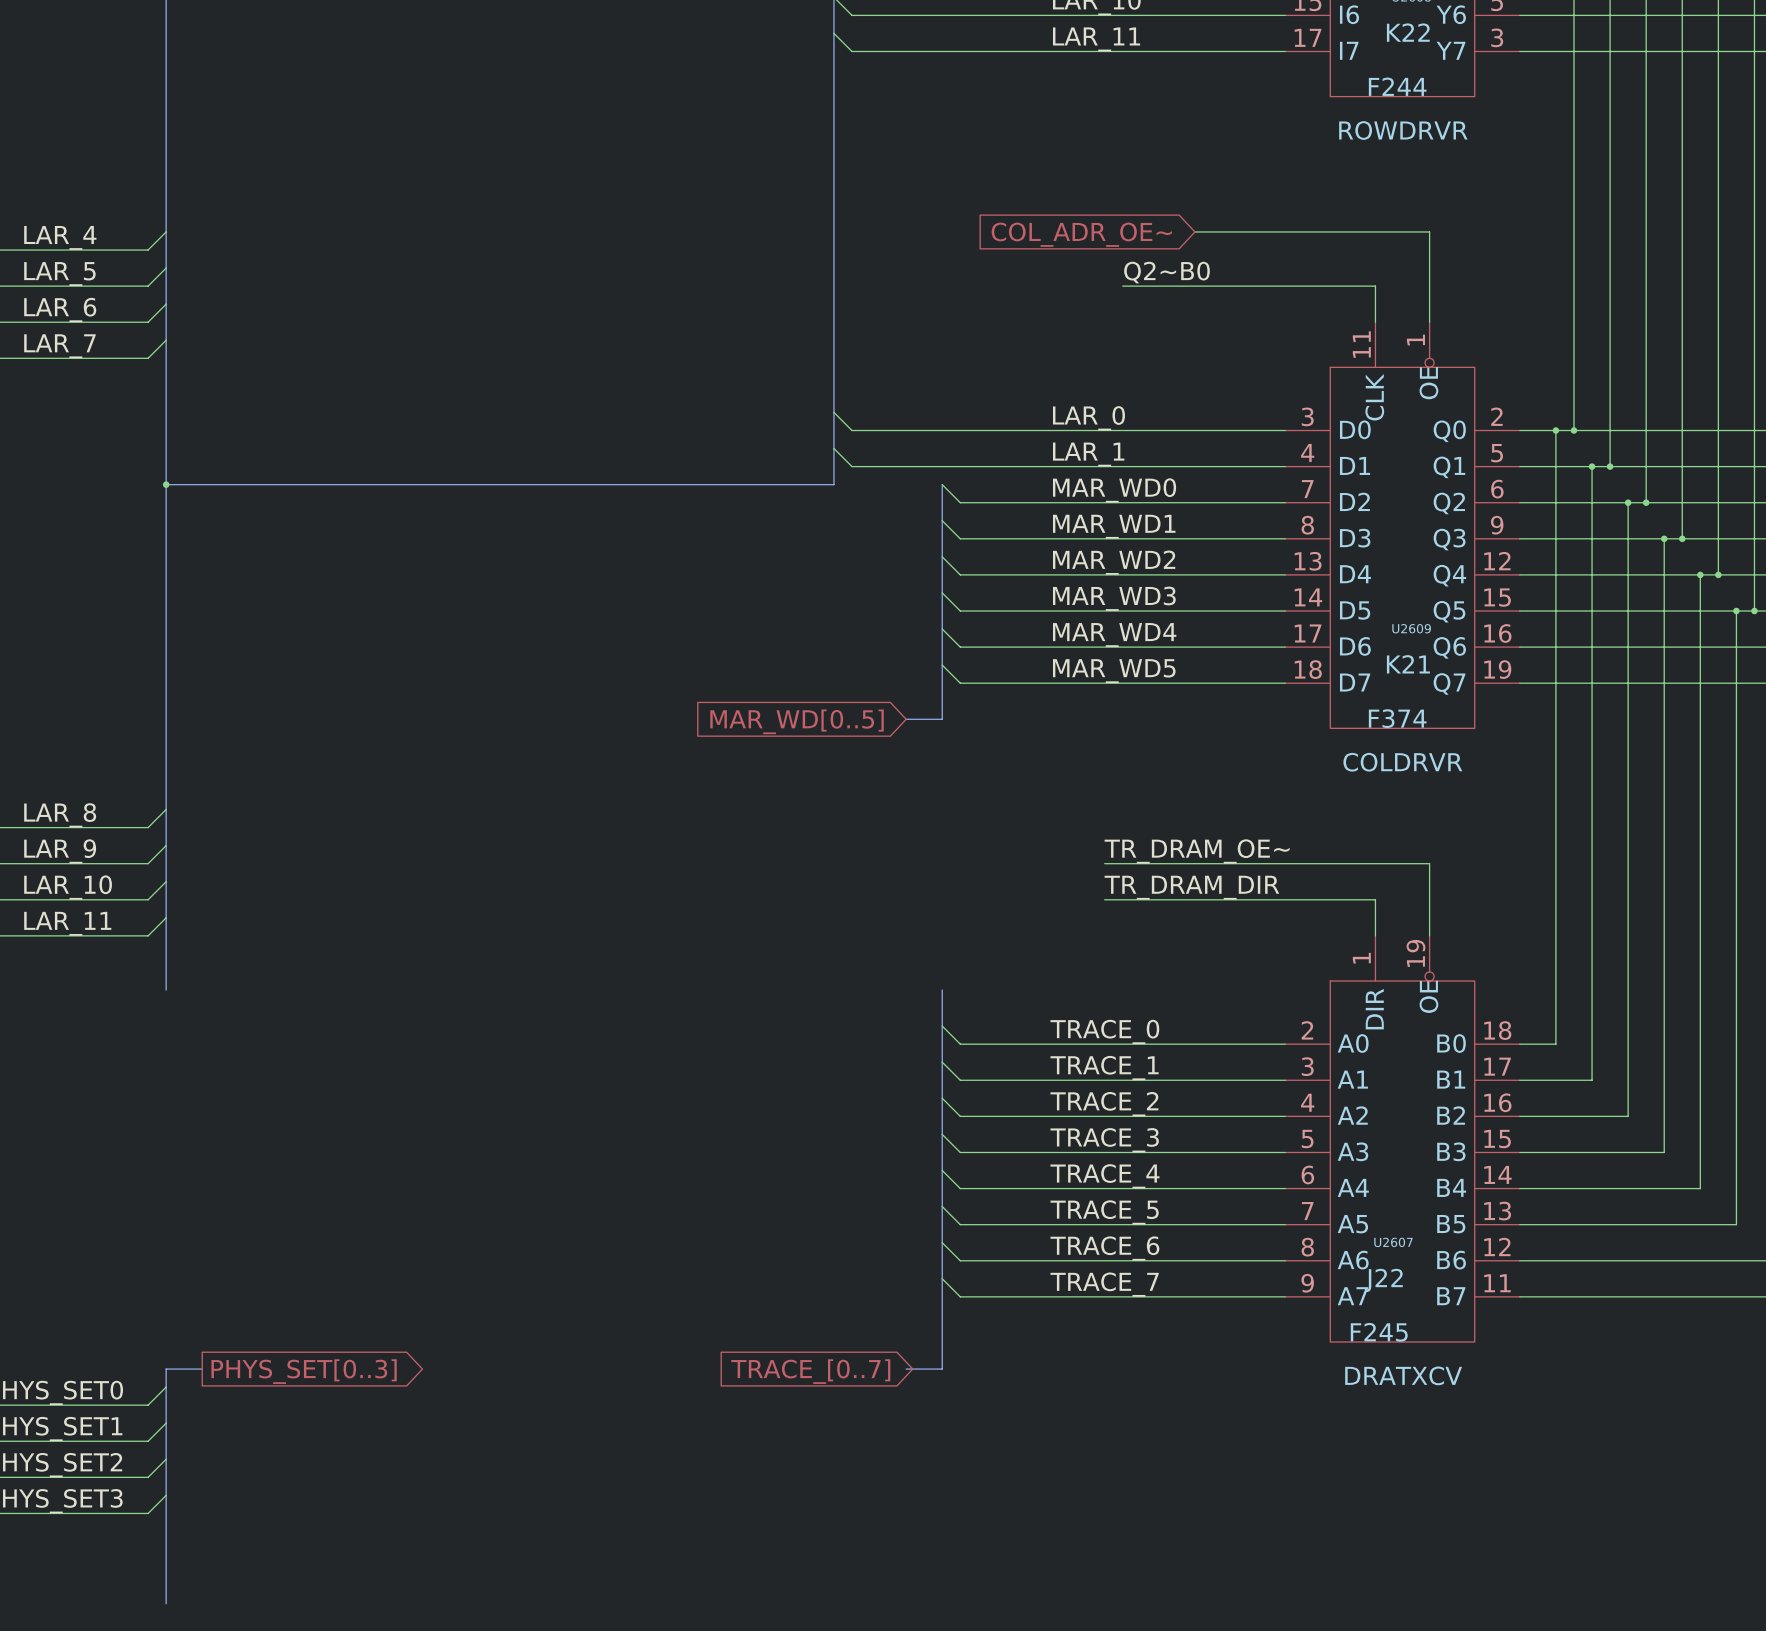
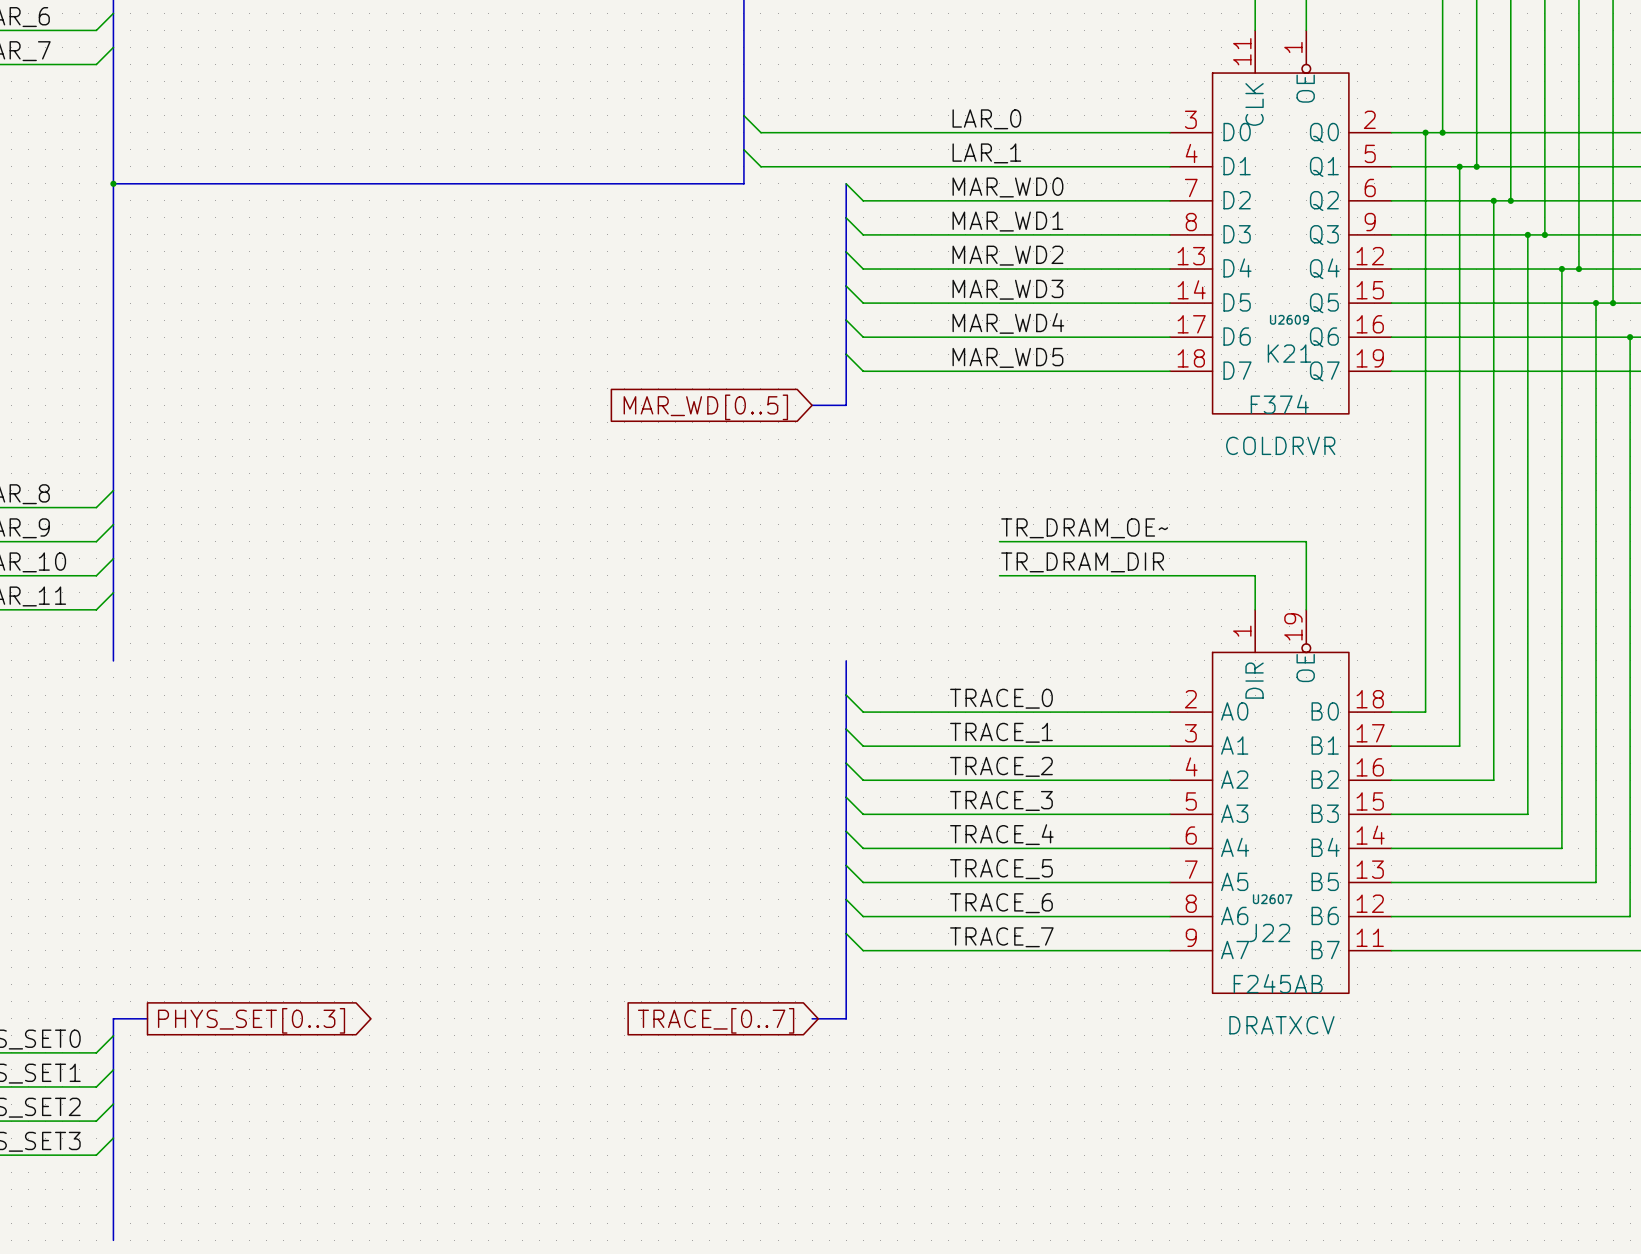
U2607 value: F245 (1379, 1332) -> F245AB (1278, 983)

